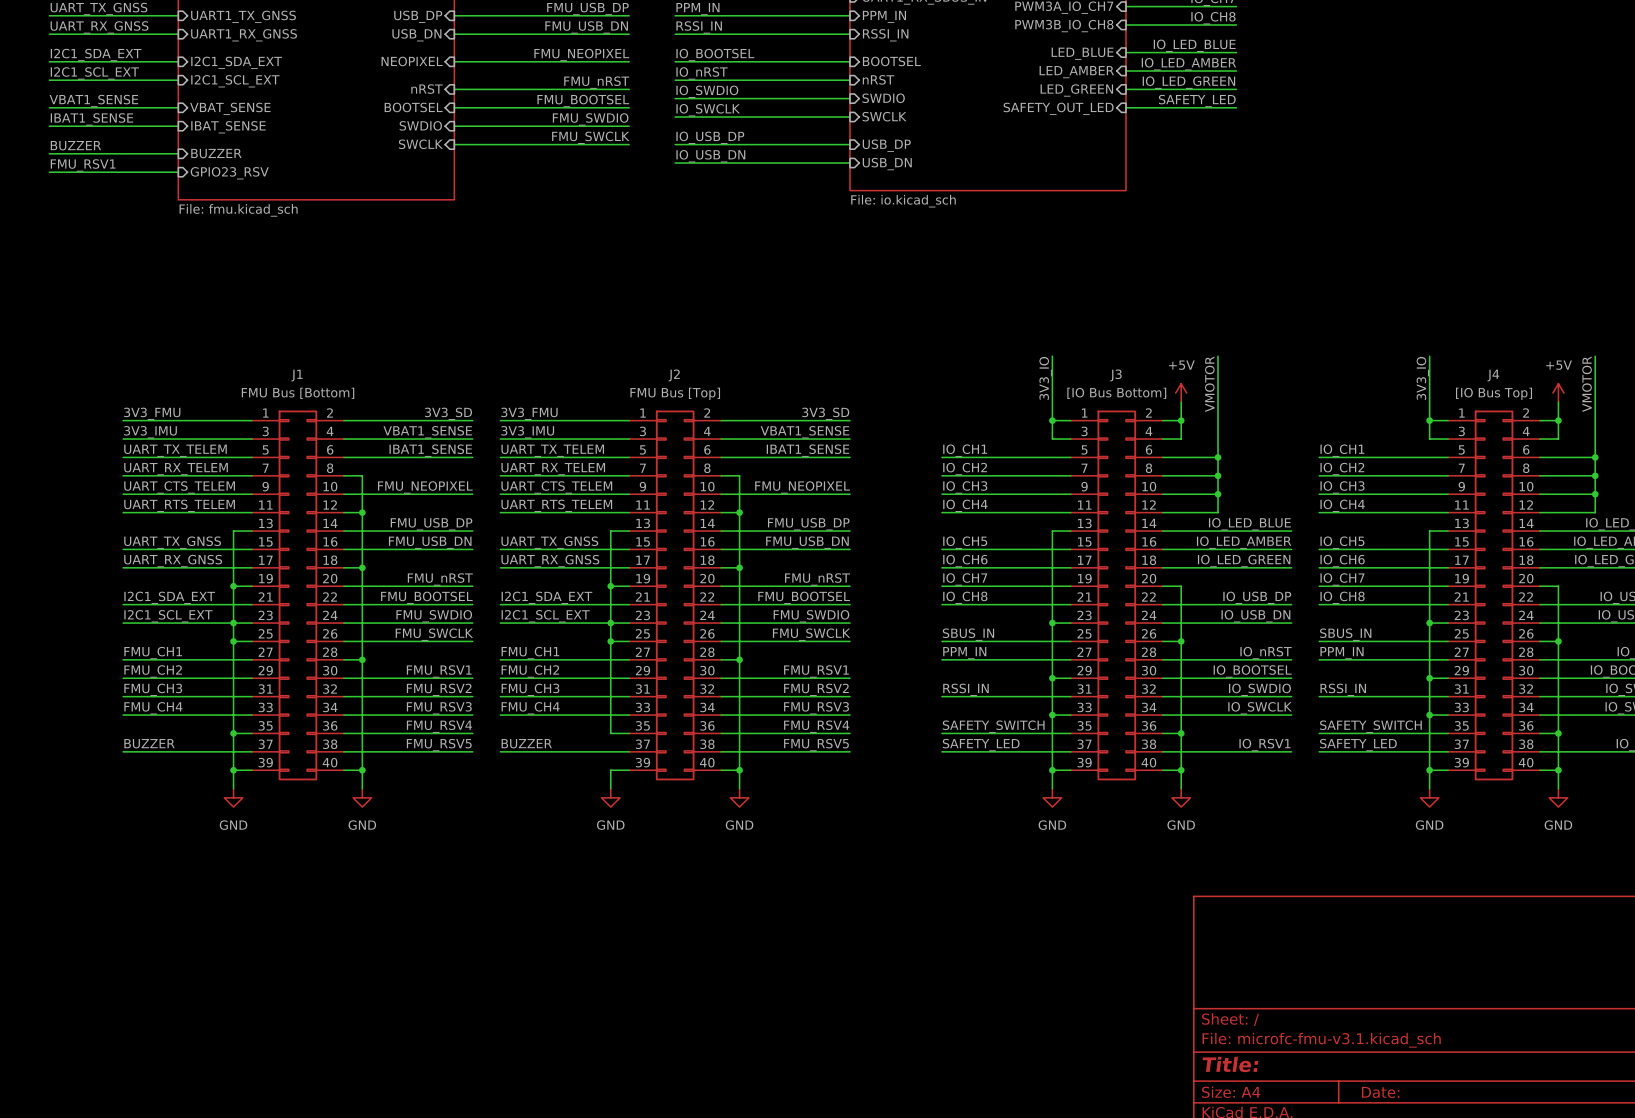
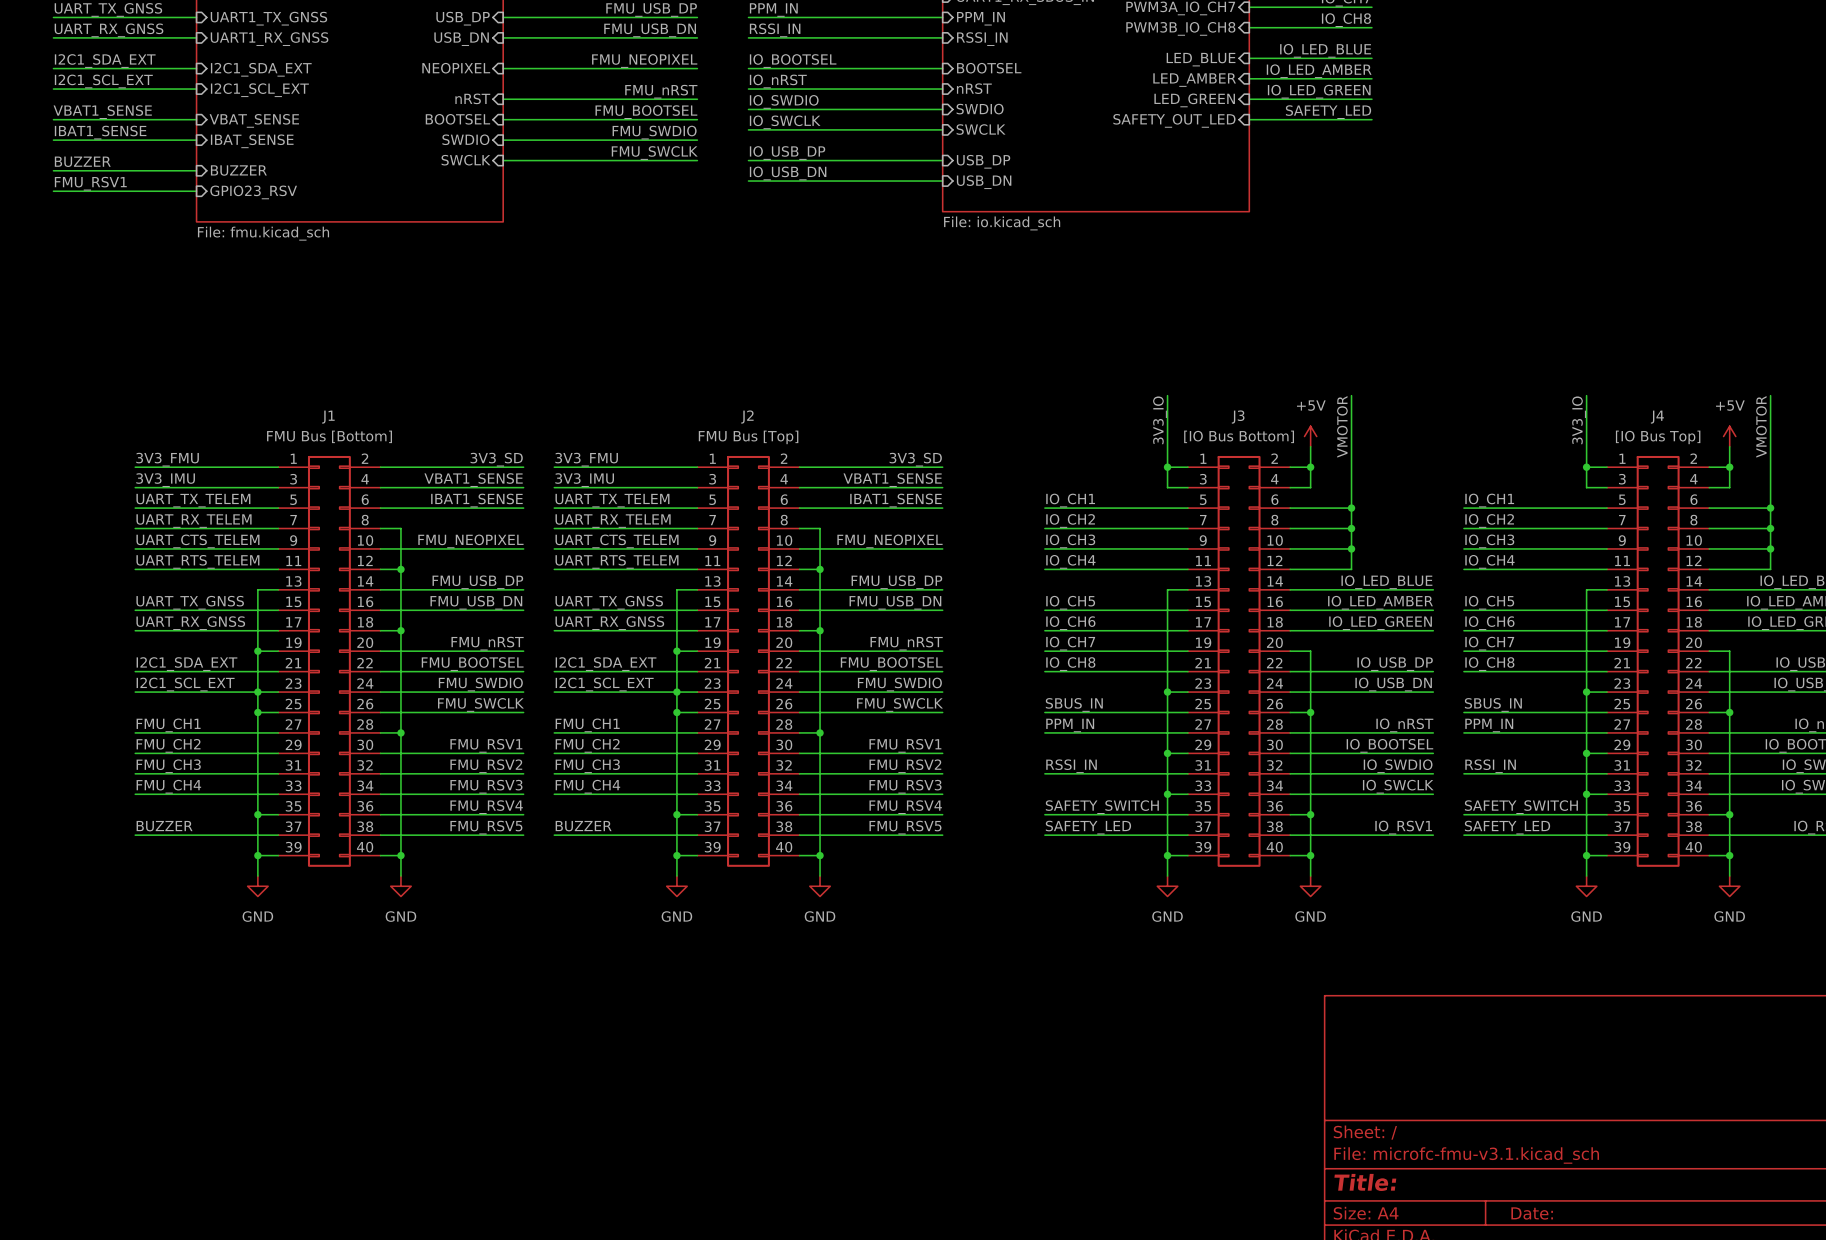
wire: none -> (676, 814) (676, 855)
junction: none -> (676, 814)
junction: none -> (676, 855)

